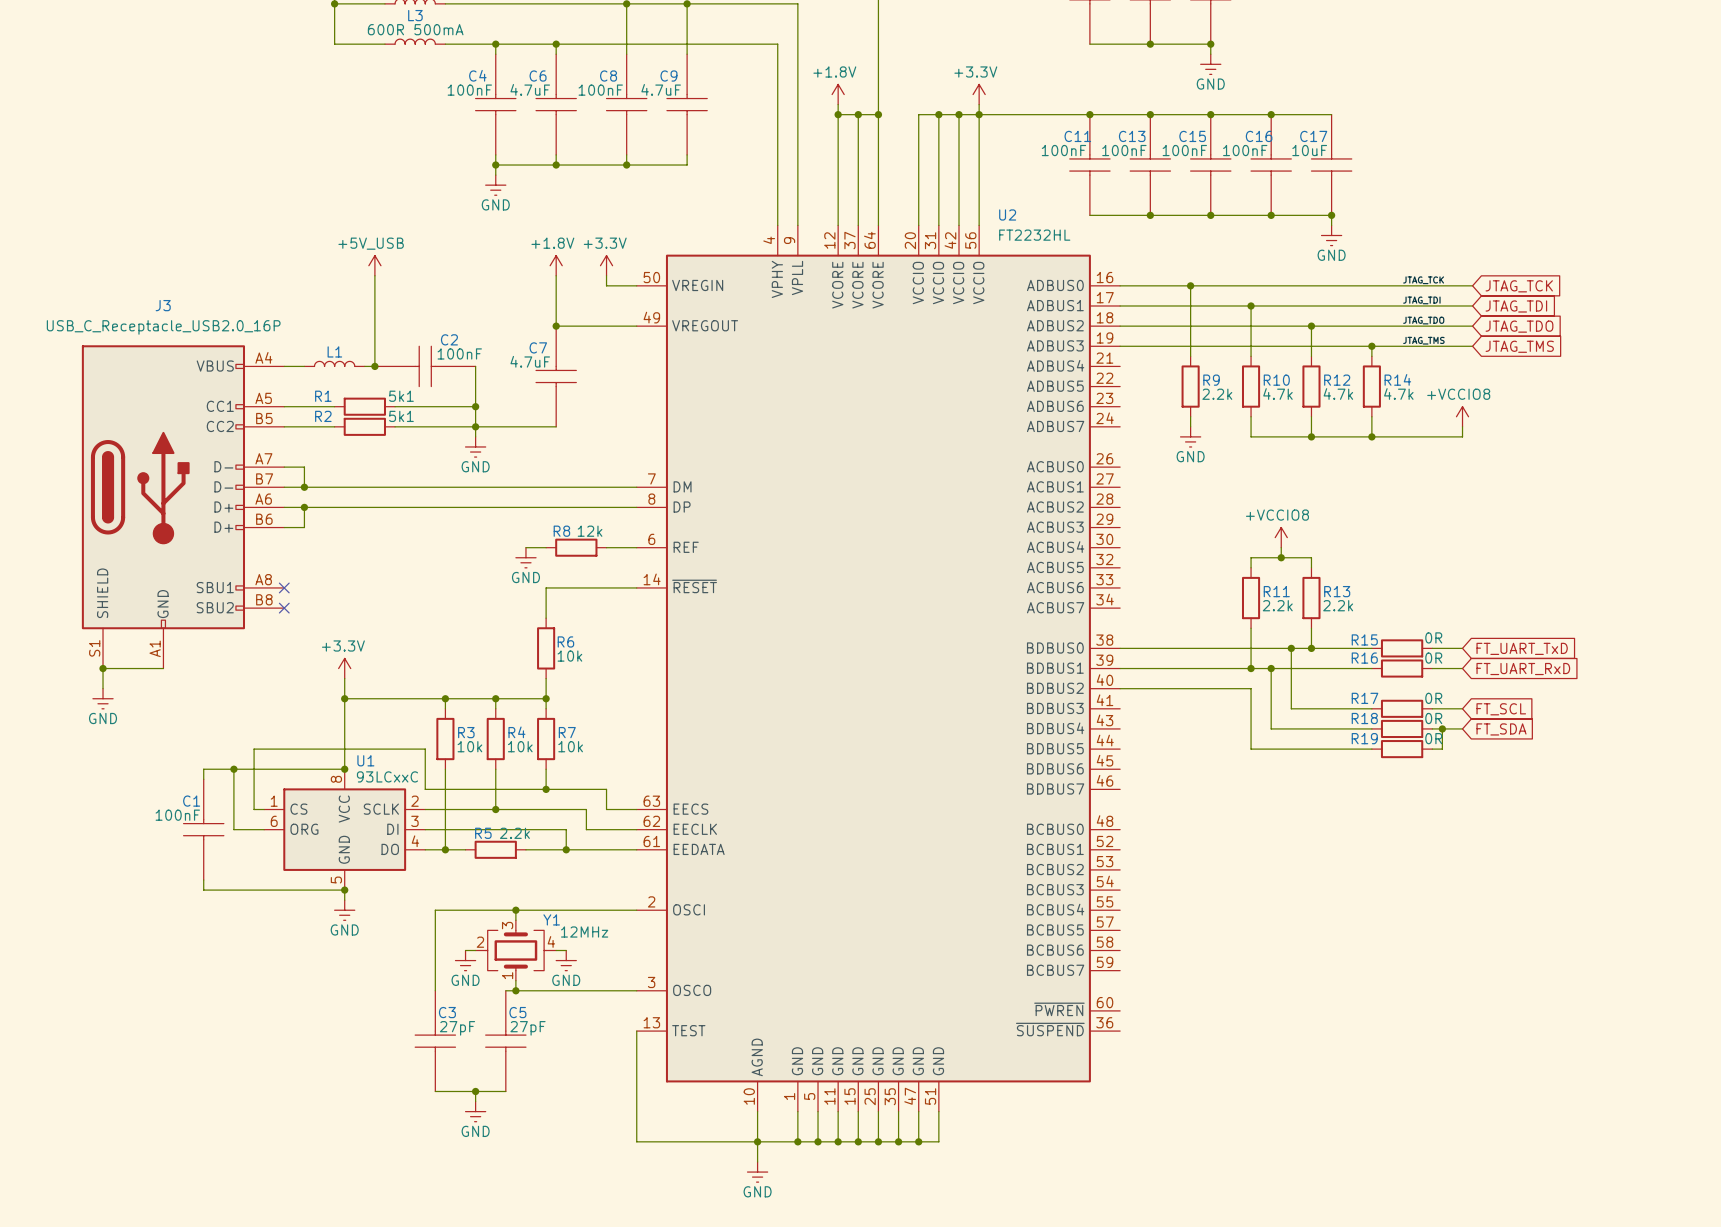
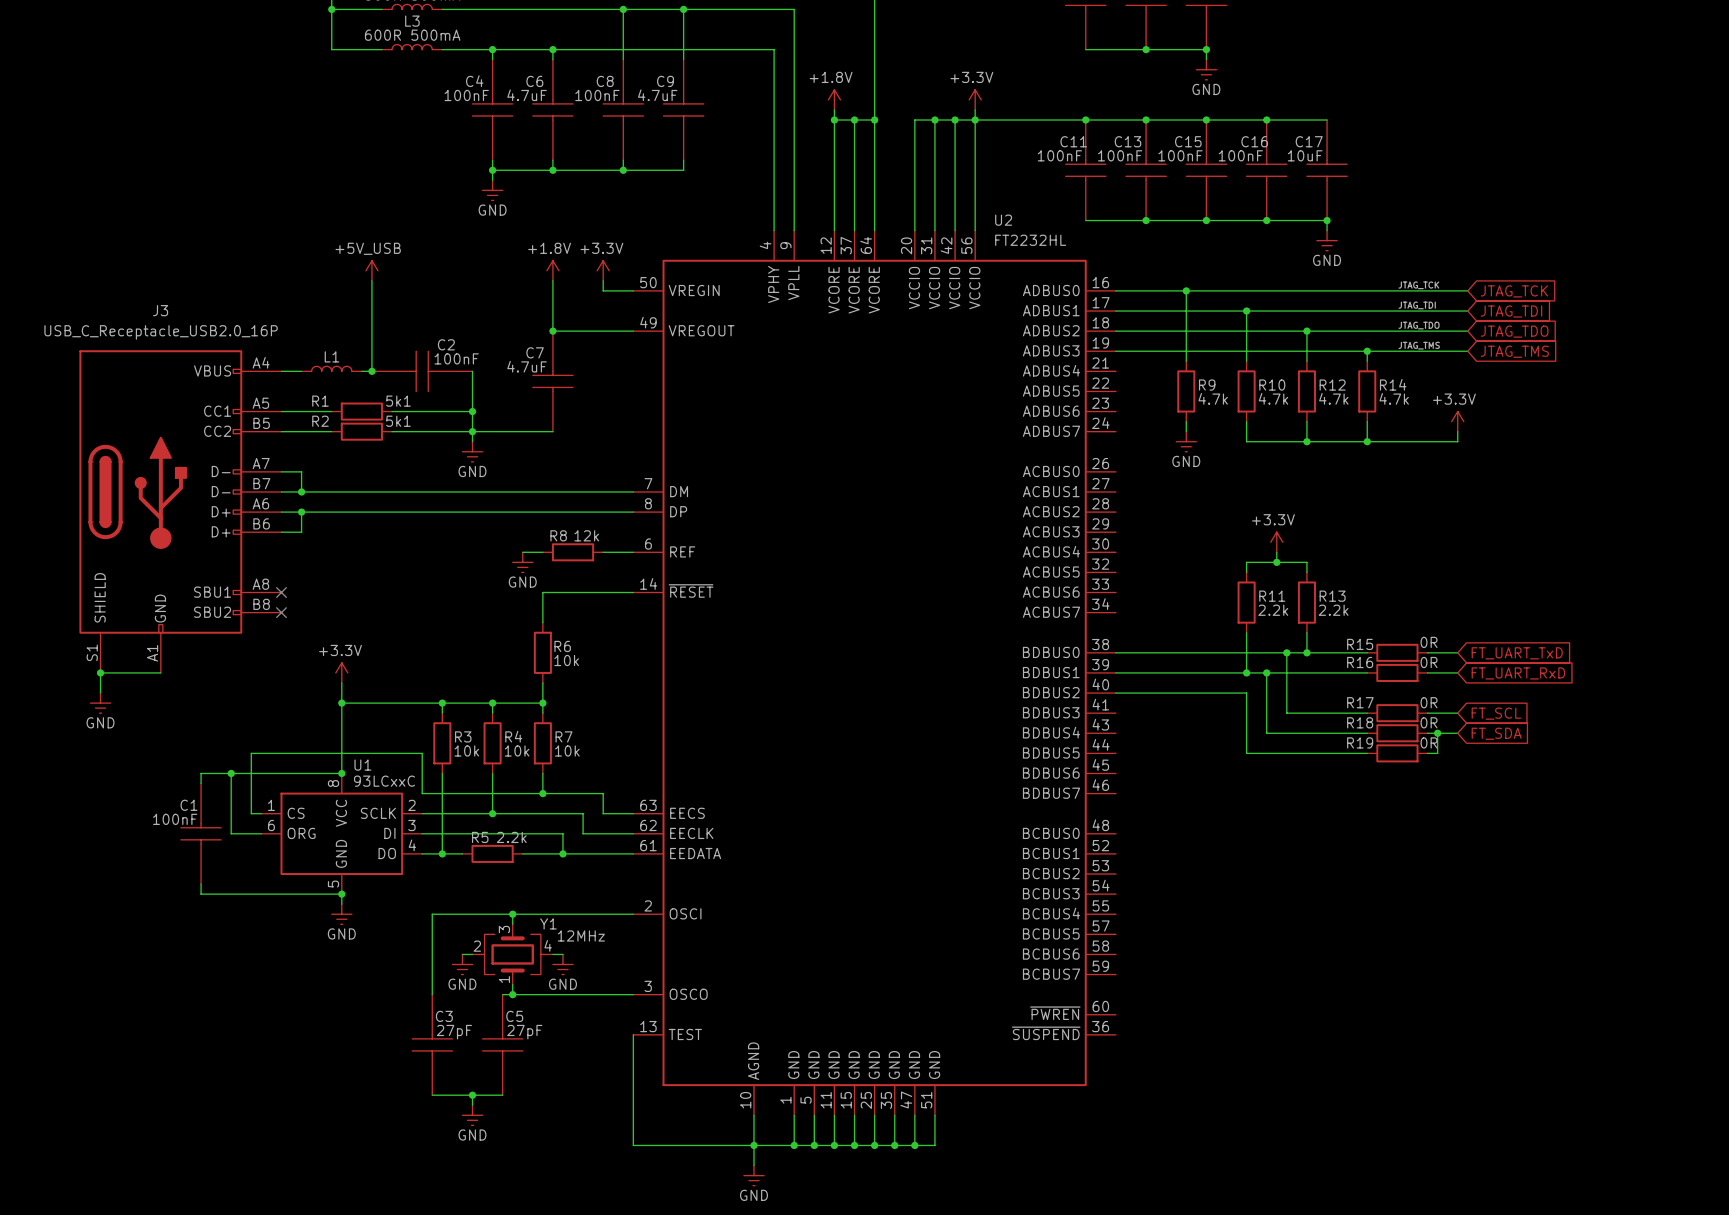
R9 value: 2.2k (1217, 394) -> 4.7k (1213, 398)
power symbol: +VCCIO8 (1462, 416) -> +3.3V (1457, 421)
power symbol: +VCCIO8 (1281, 537) -> +3.3V (1276, 542)

